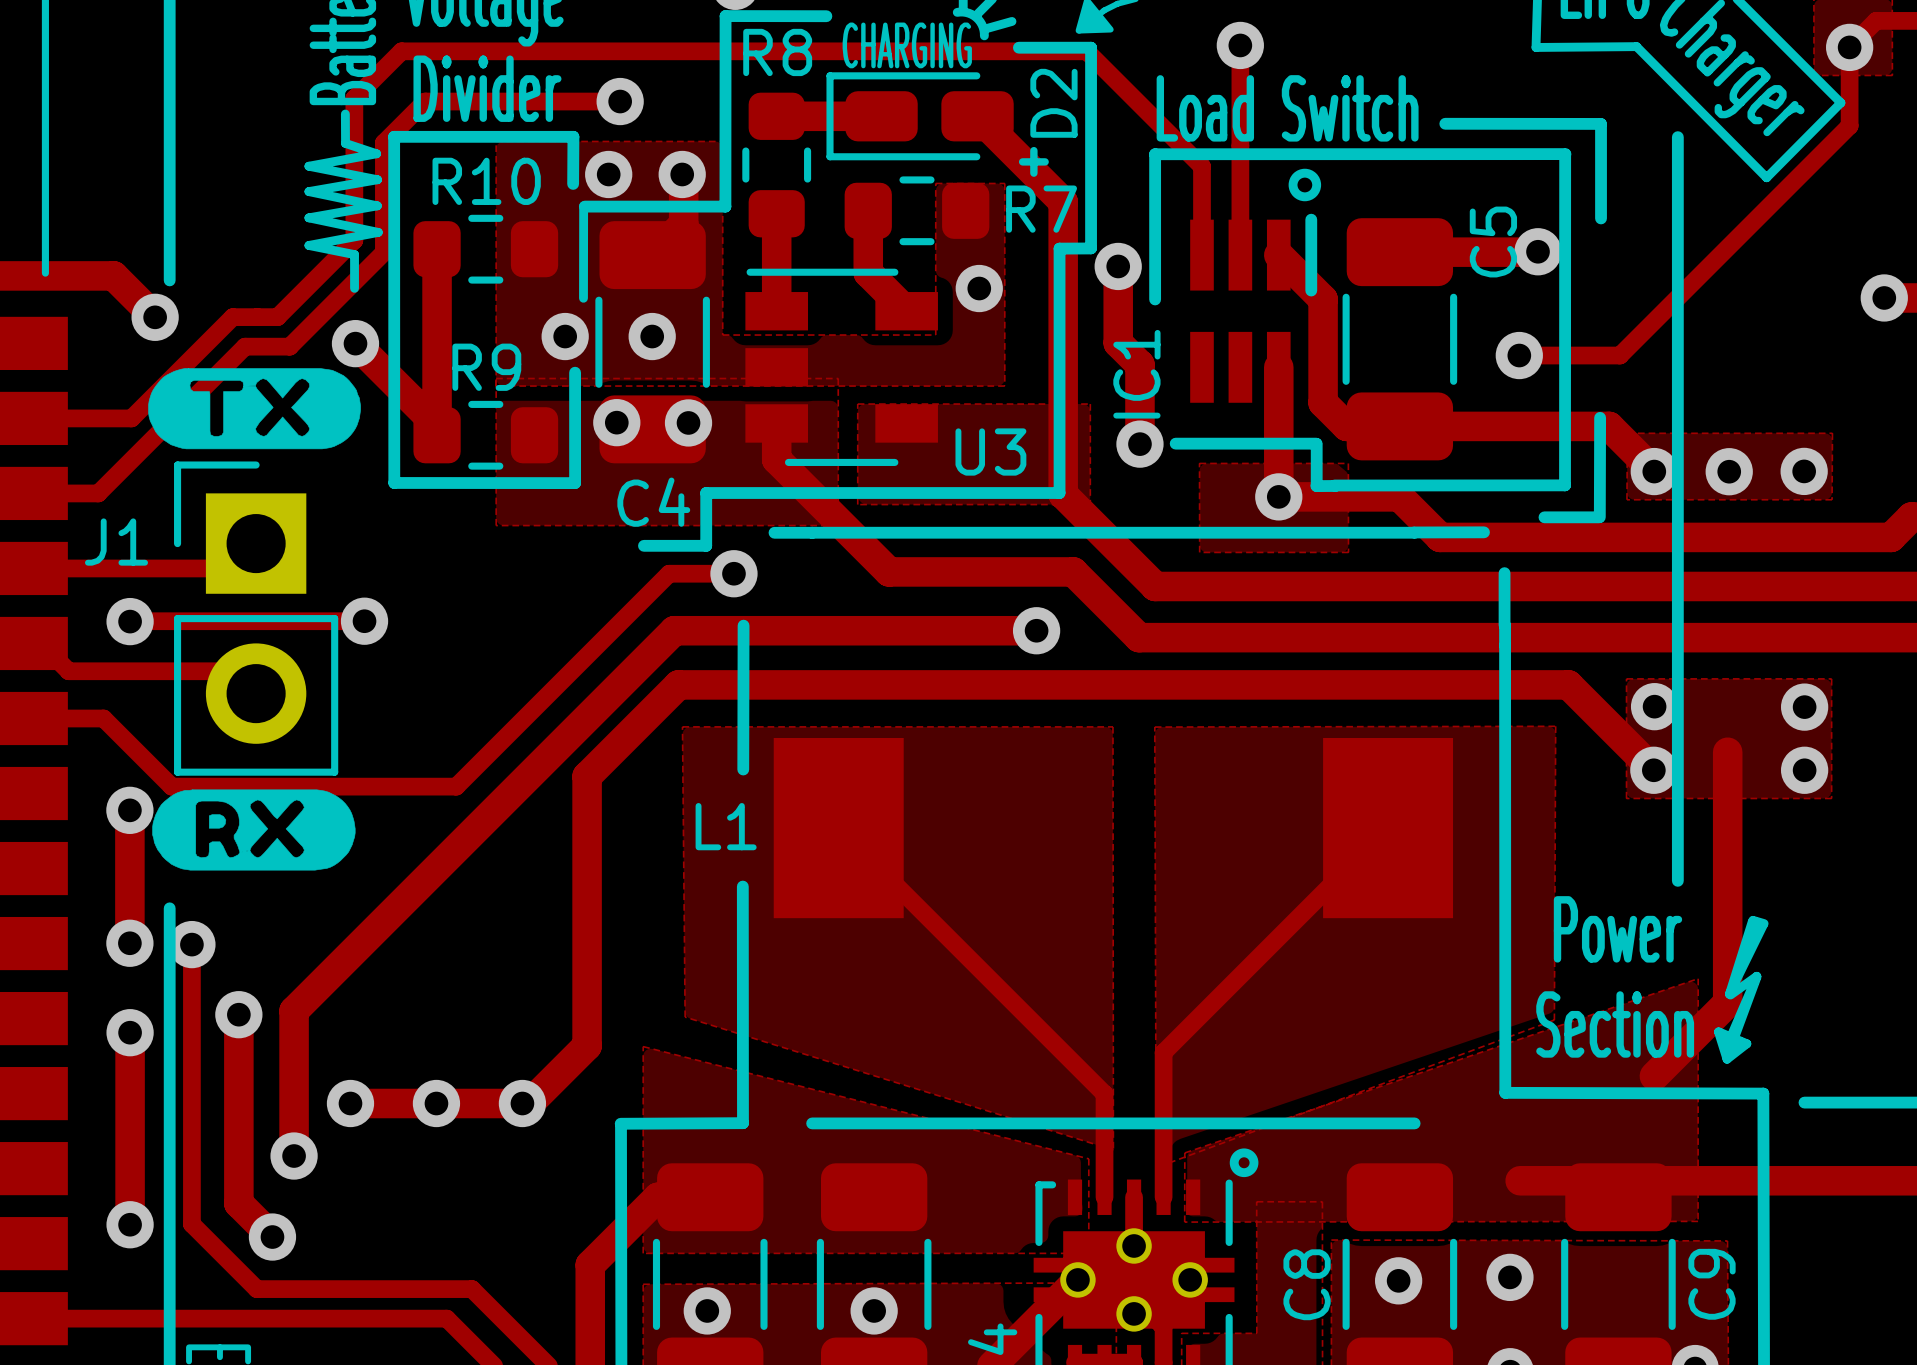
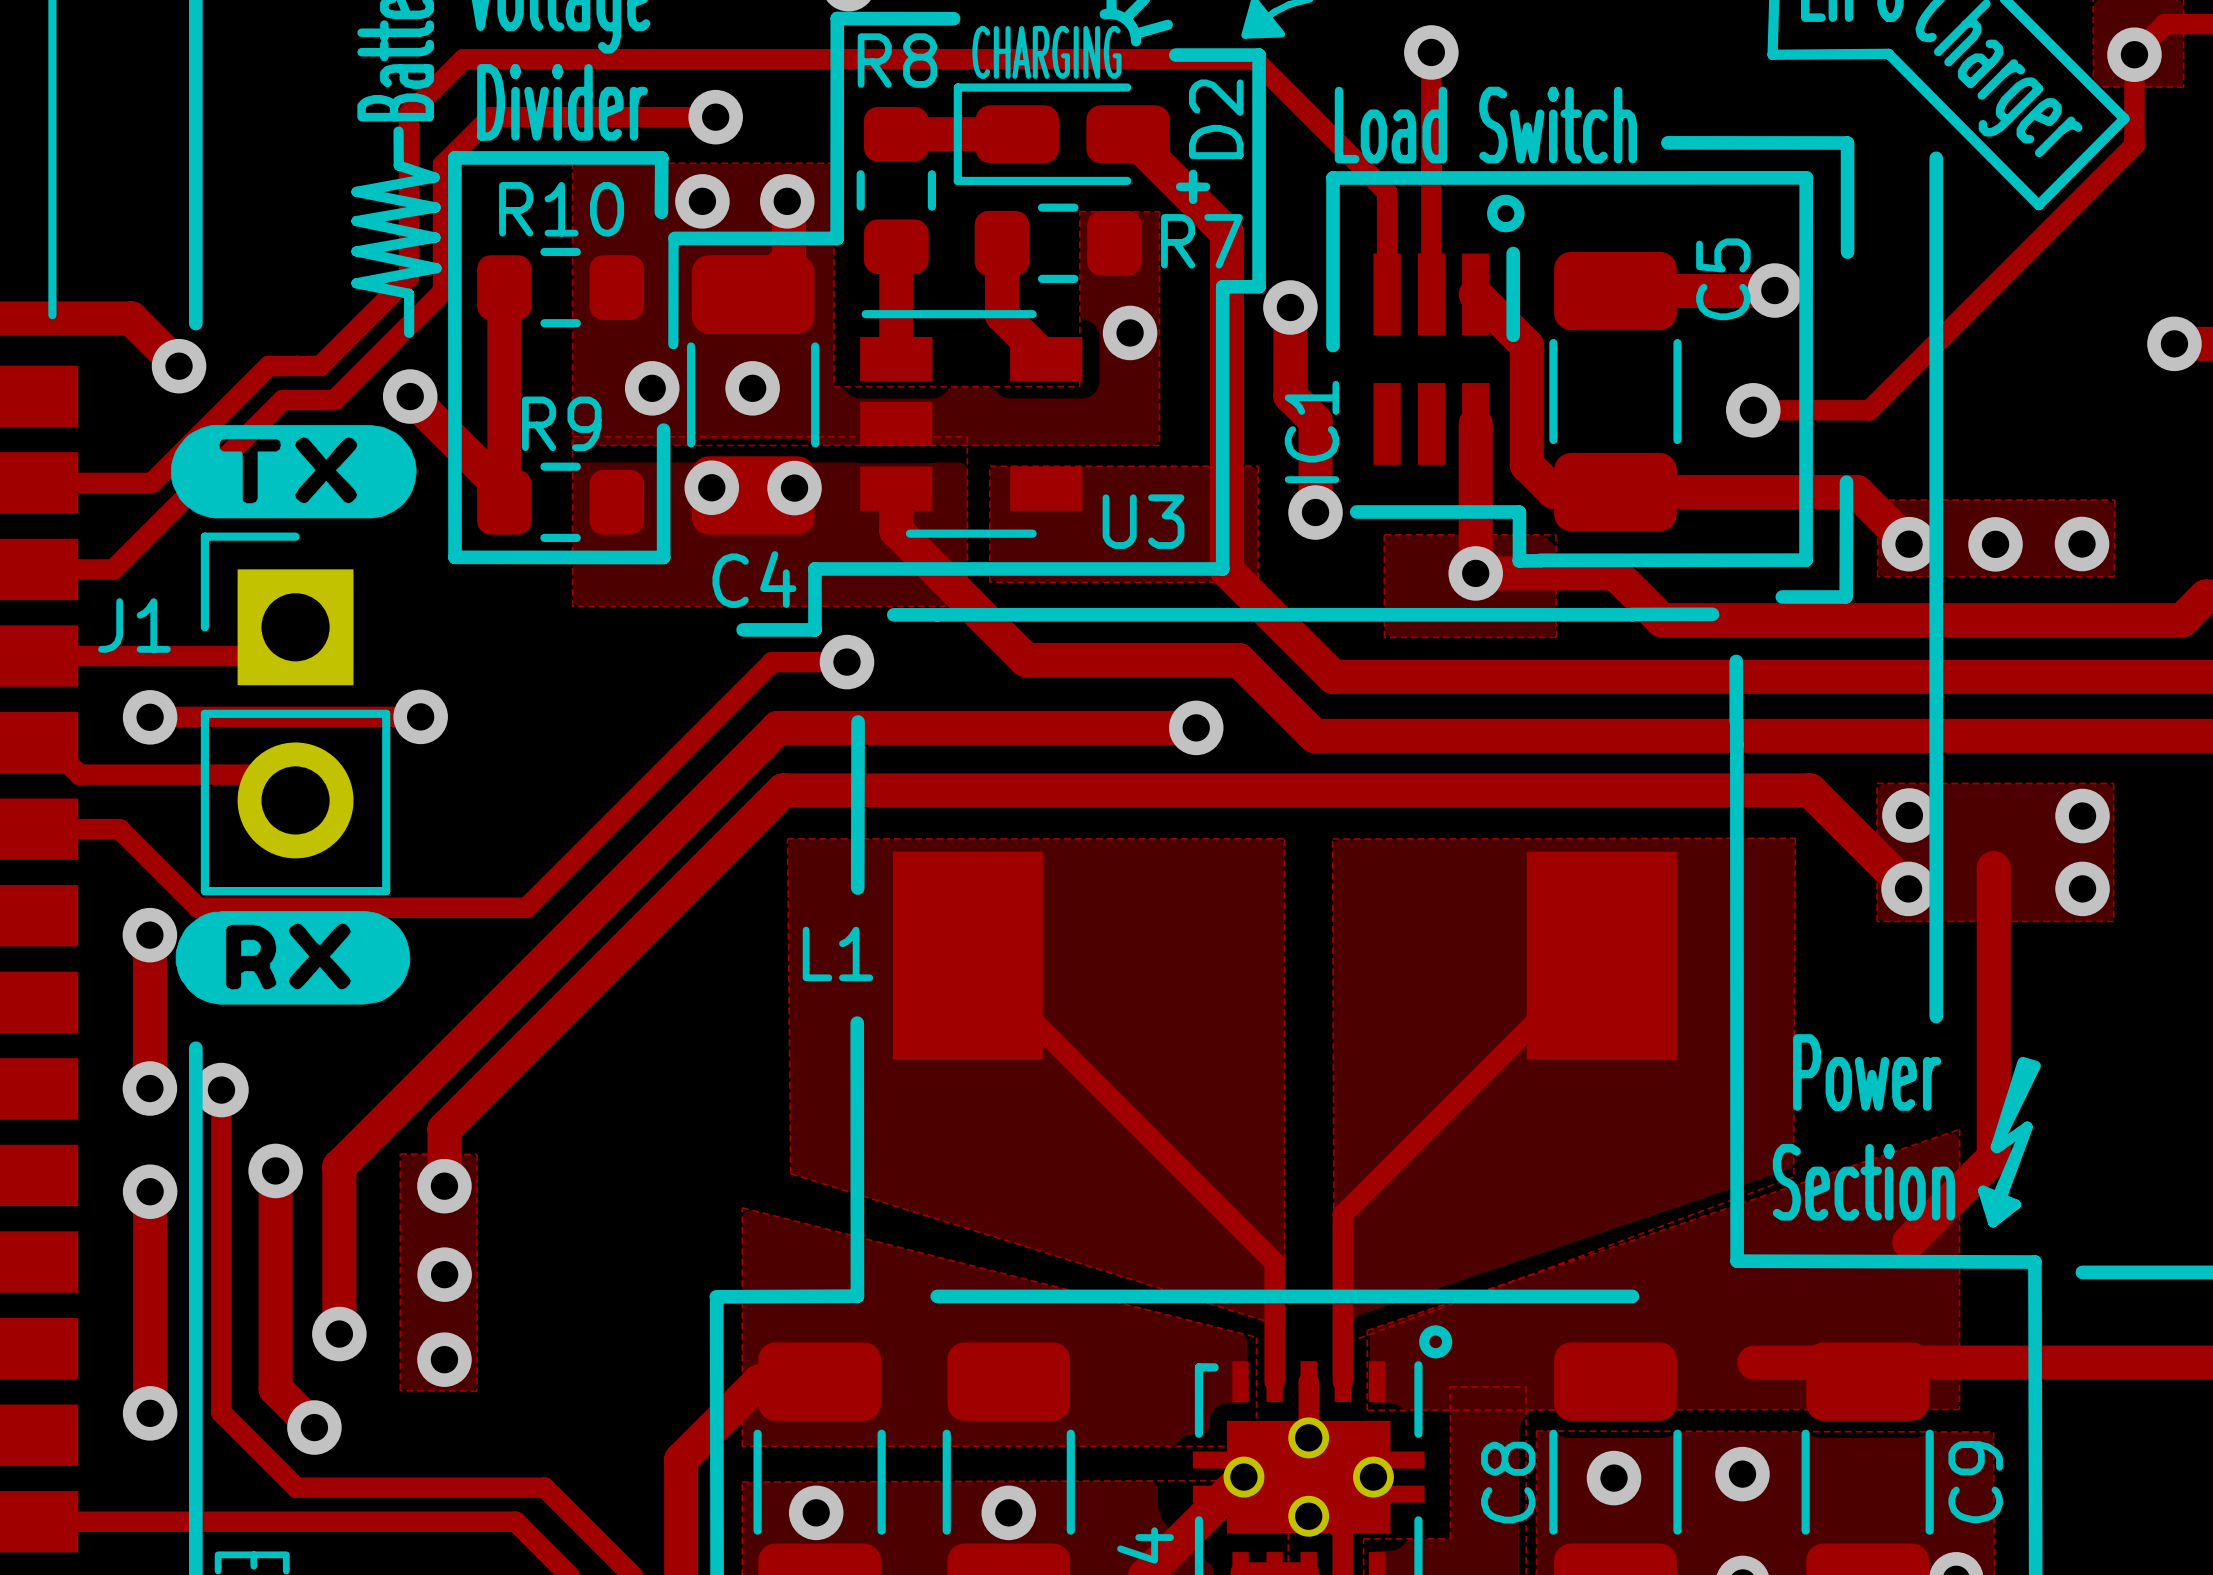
track: (587, 776) (587, 1045) (529, 1103) (350, 1103) -> (677, 895) (444, 1129) (444, 1186)
zone outline: none -> (400, 1154) (400, 1390) (477, 1391) (477, 1154) (400, 1154)
via: none -> (444, 1186)
via position: (350, 1103) -> (444, 1274)
via: (436, 1103) -> none
via: (522, 1103) -> none
via: none -> (444, 1359)

